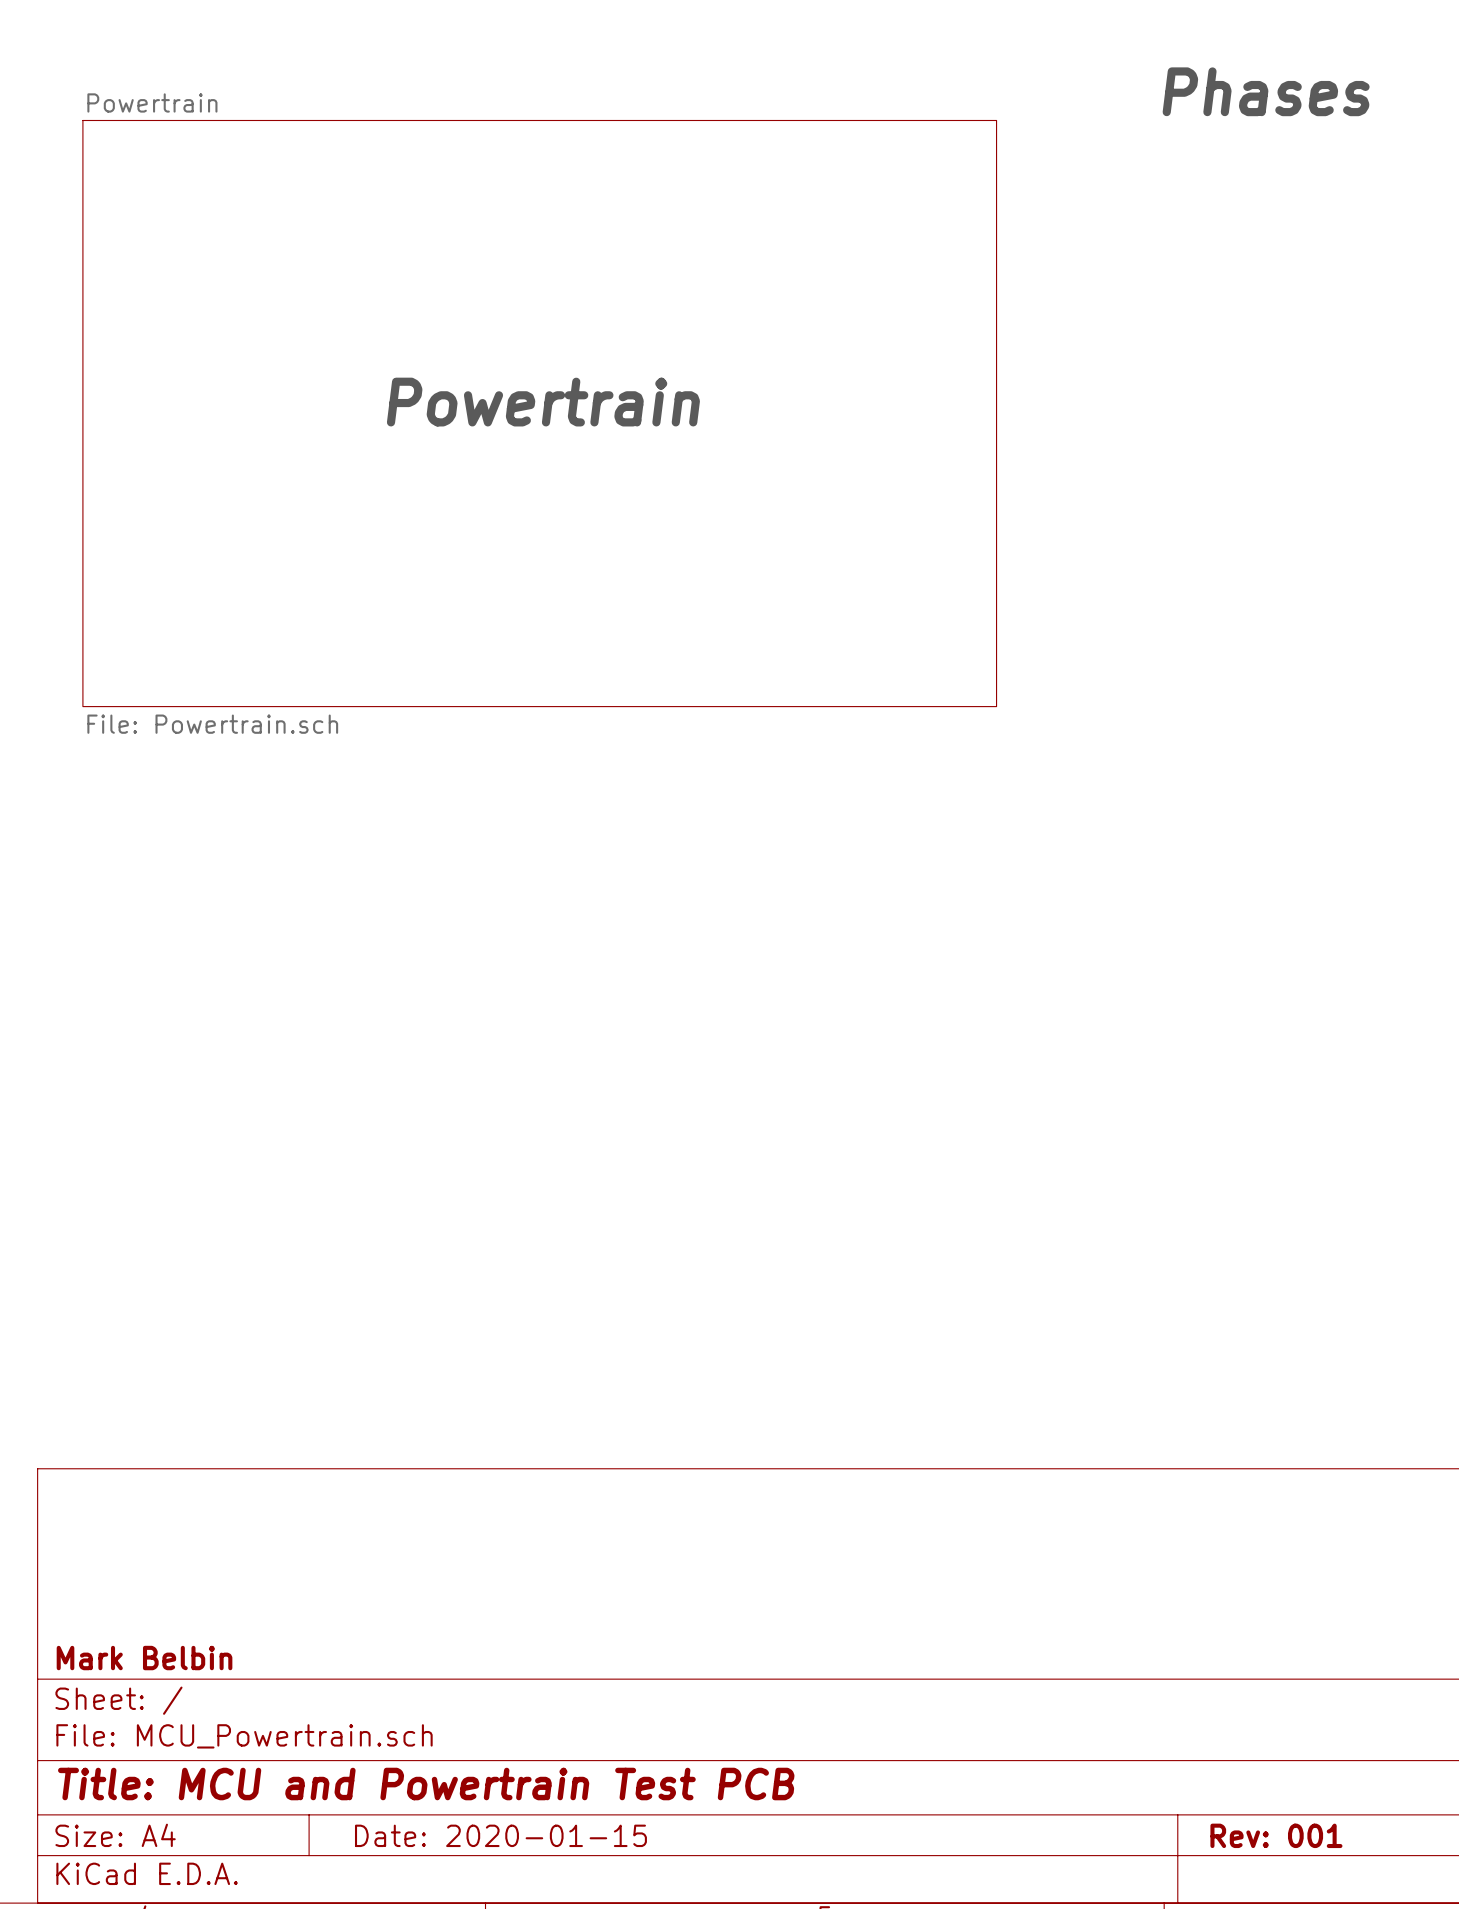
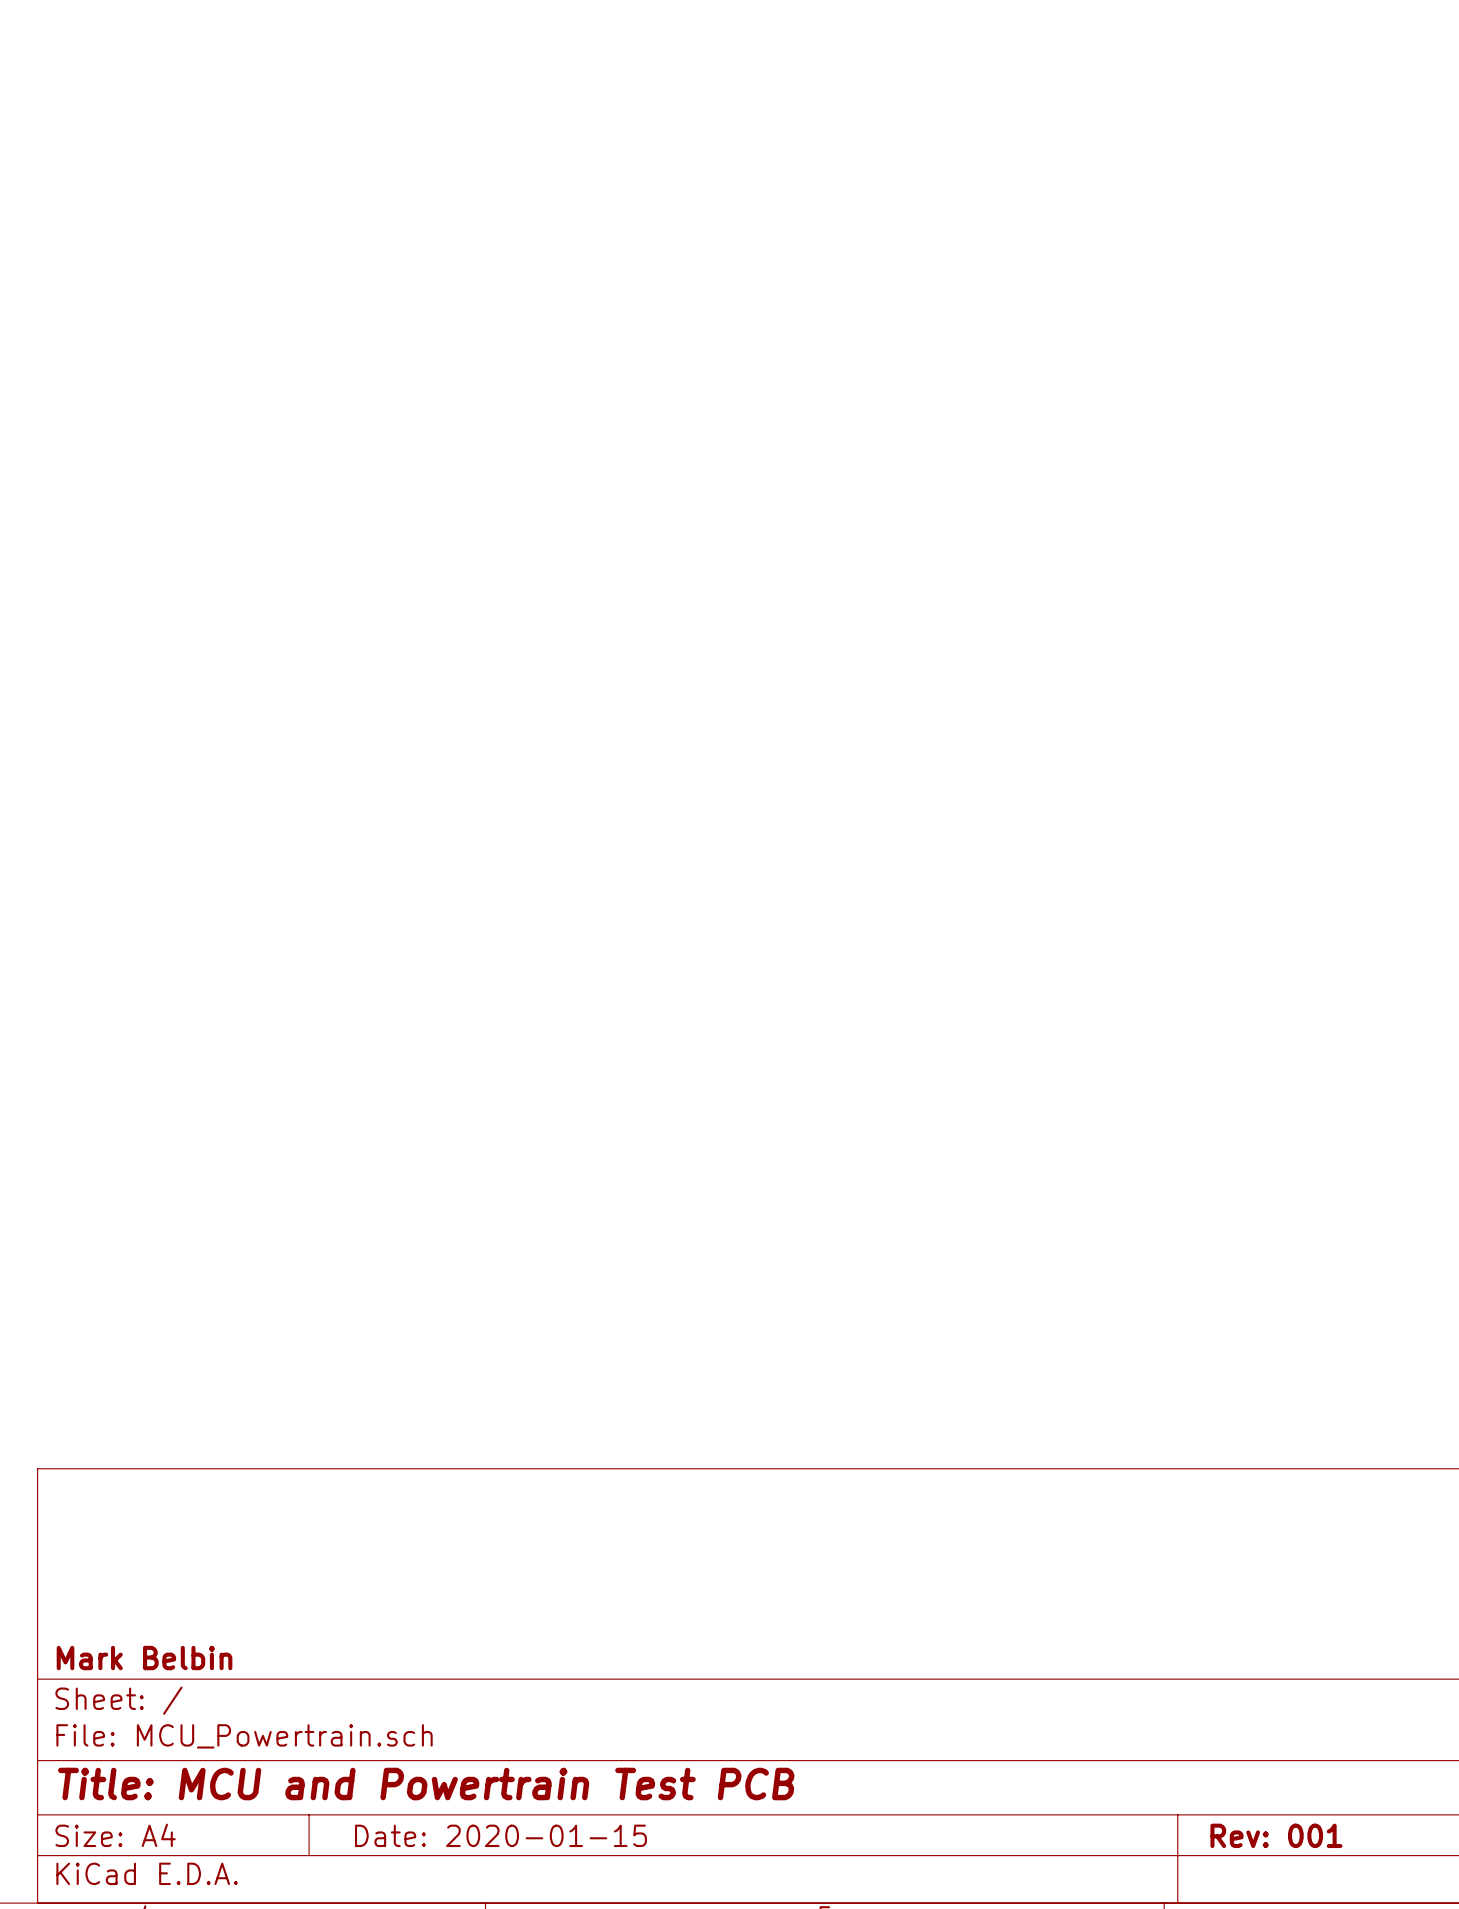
text: Phases (1266, 91) -> none
text: Powertrain (543, 402) -> none
sheet Powertrain: File: Powertrain.sch (539, 413) -> none

